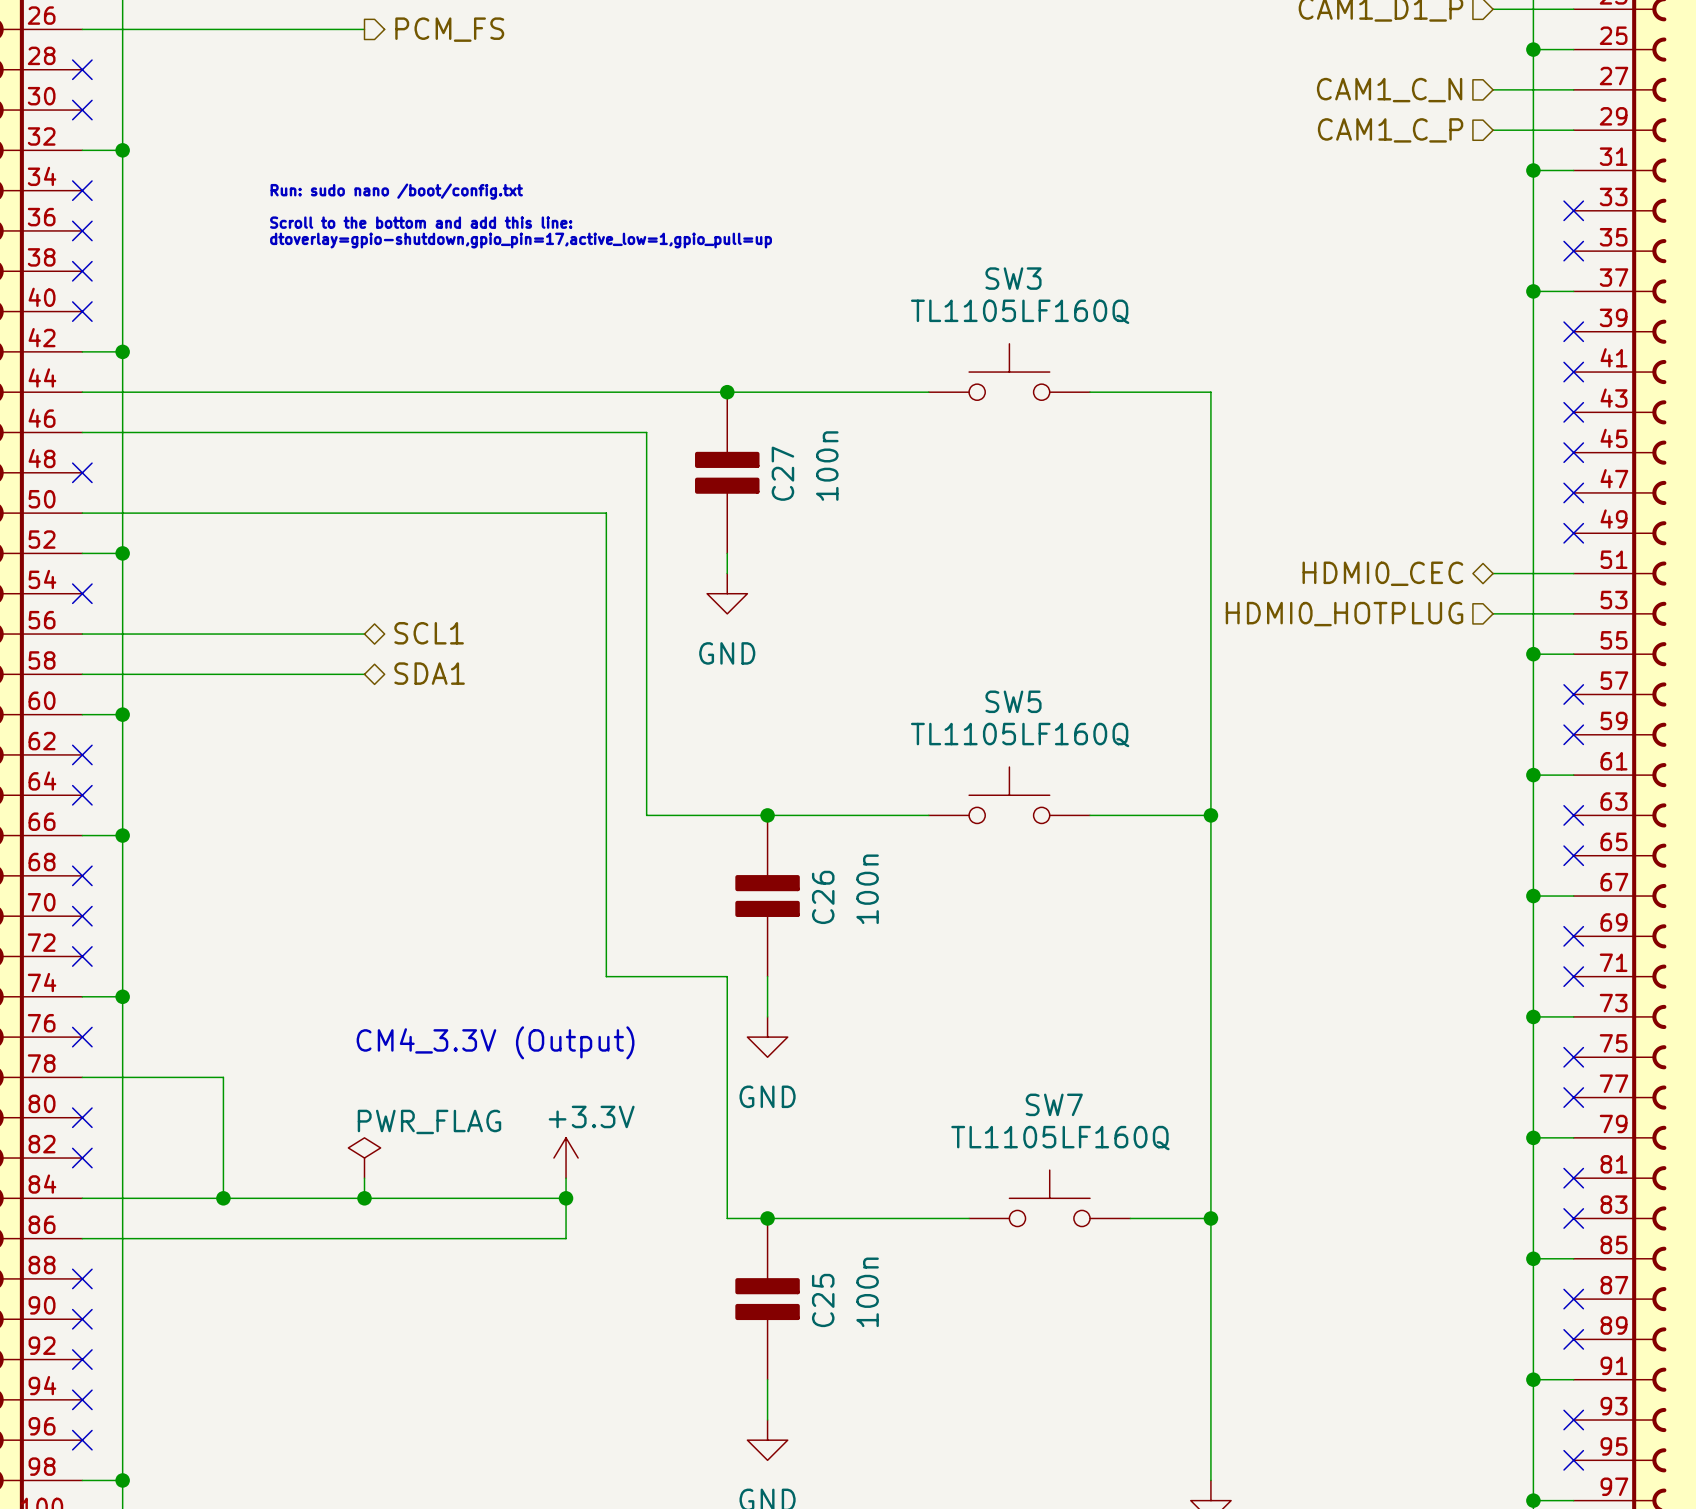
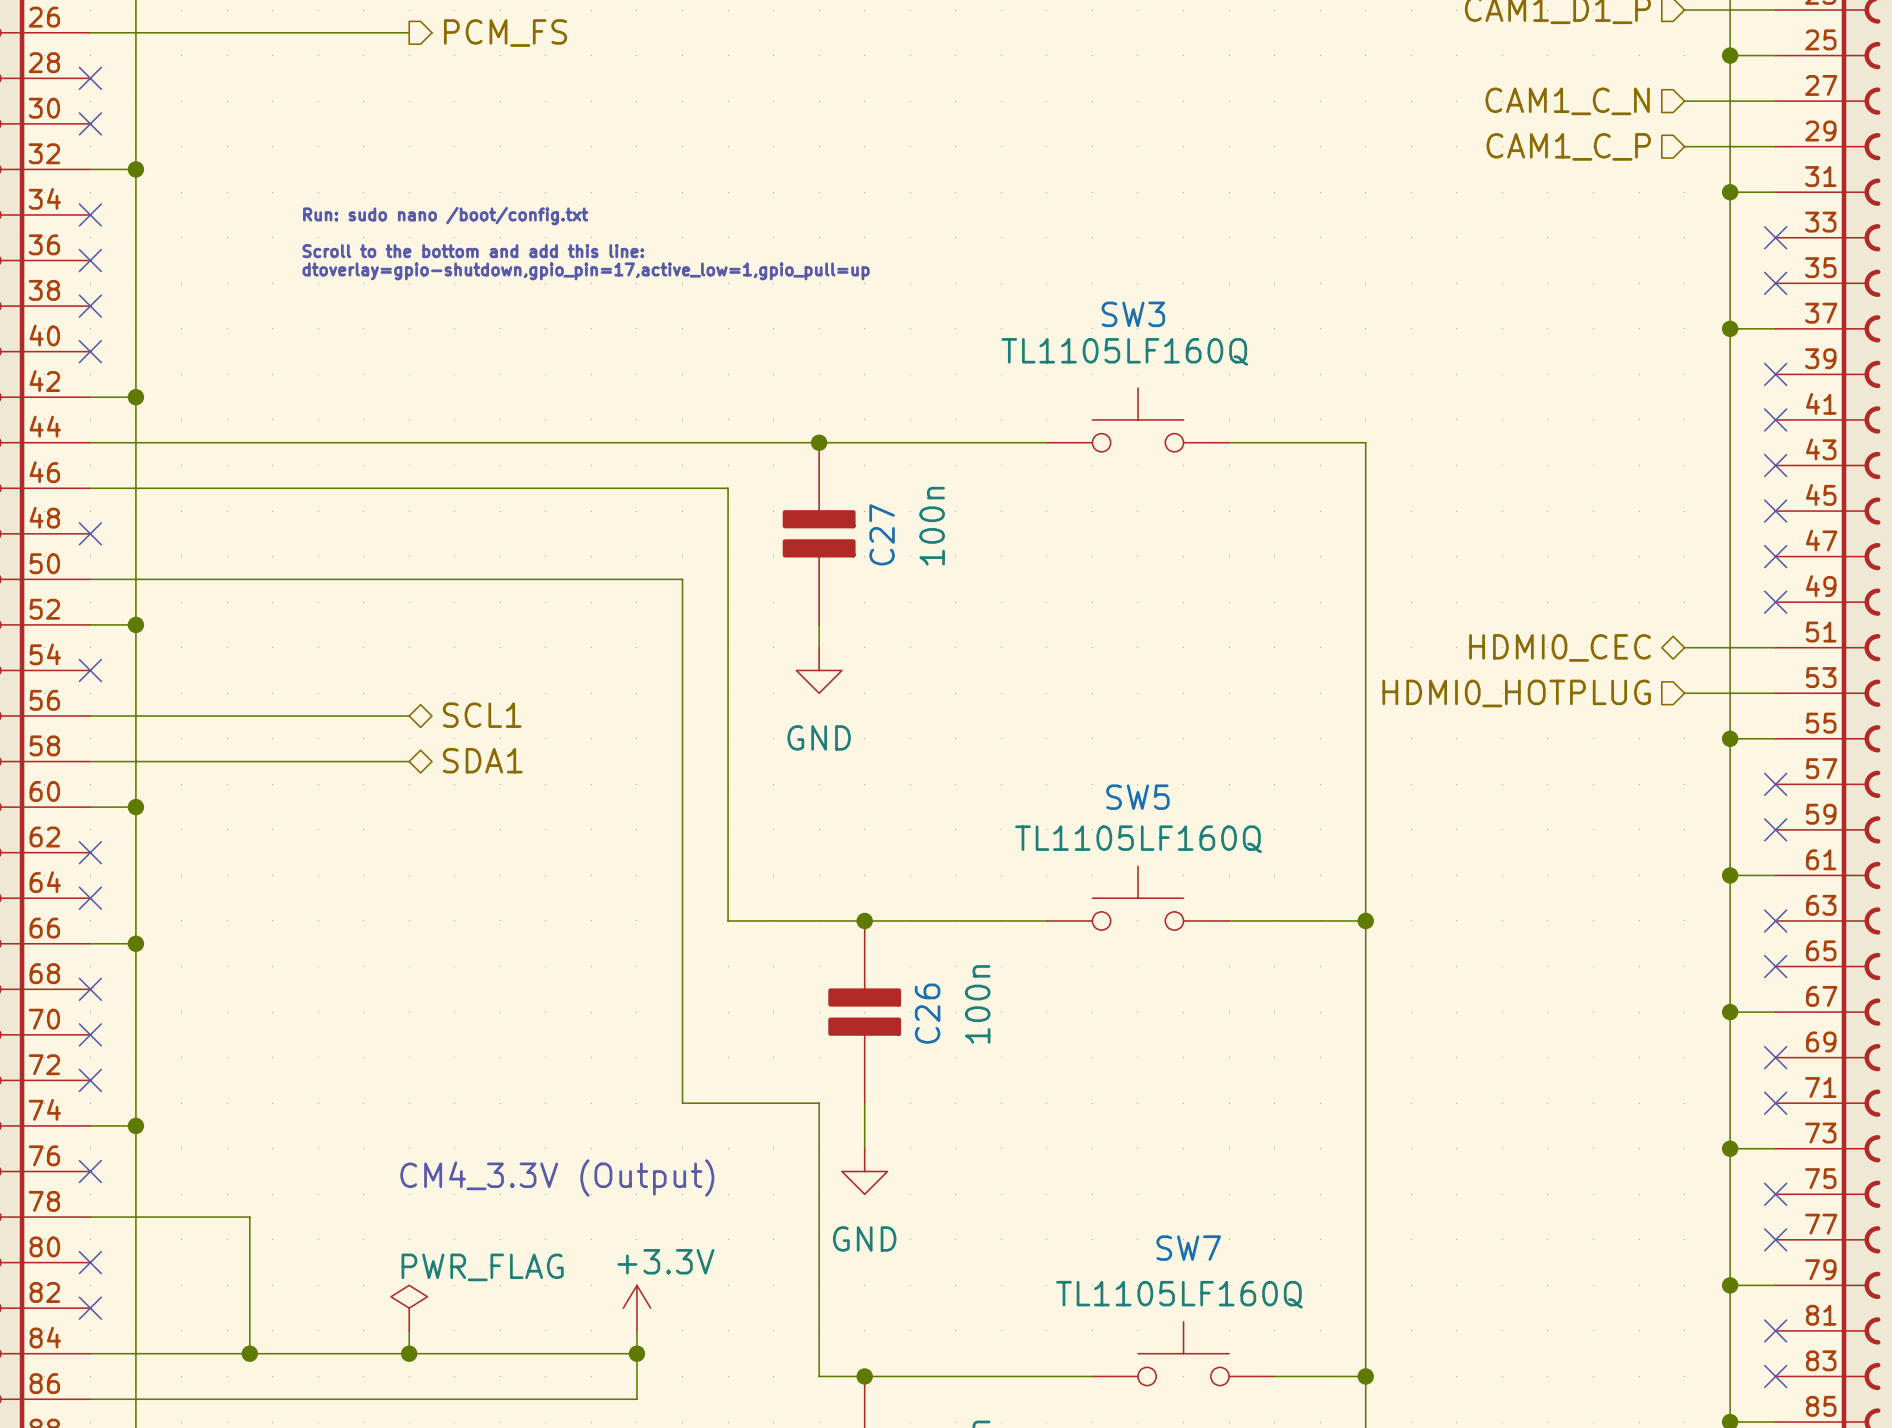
SW3 name position: SW3 (1013, 278) -> SW3 (1133, 314)
SW3 value position: TL1105LF160Q (1020, 311) -> TL1105LF160Q (1124, 351)
SW5 name position: SW5 (1013, 701) -> SW5 (1137, 797)
SW5 value position: TL1105LF160Q (1020, 735) -> TL1105LF160Q (1138, 839)
SW7 value position: TL1105LF160Q (1060, 1138) -> TL1105LF160Q (1179, 1294)

